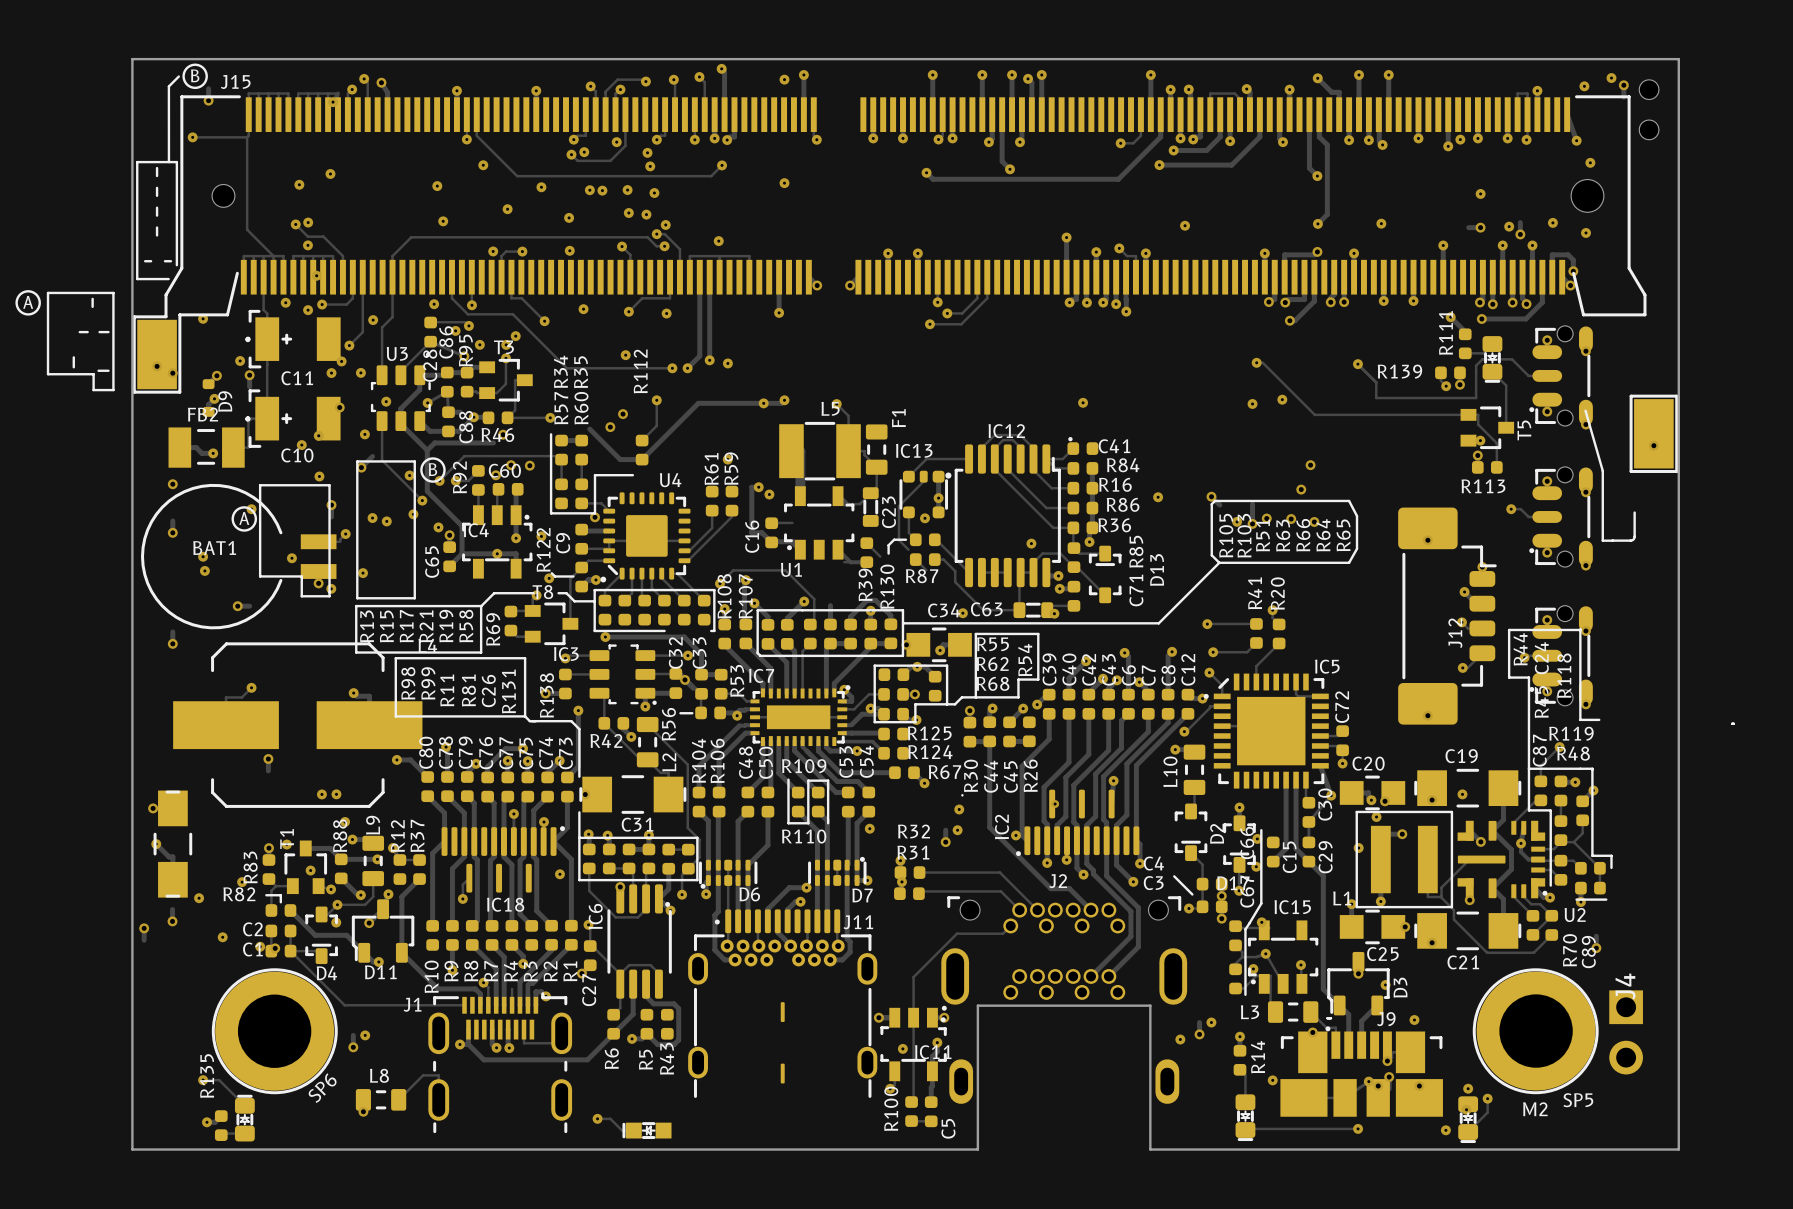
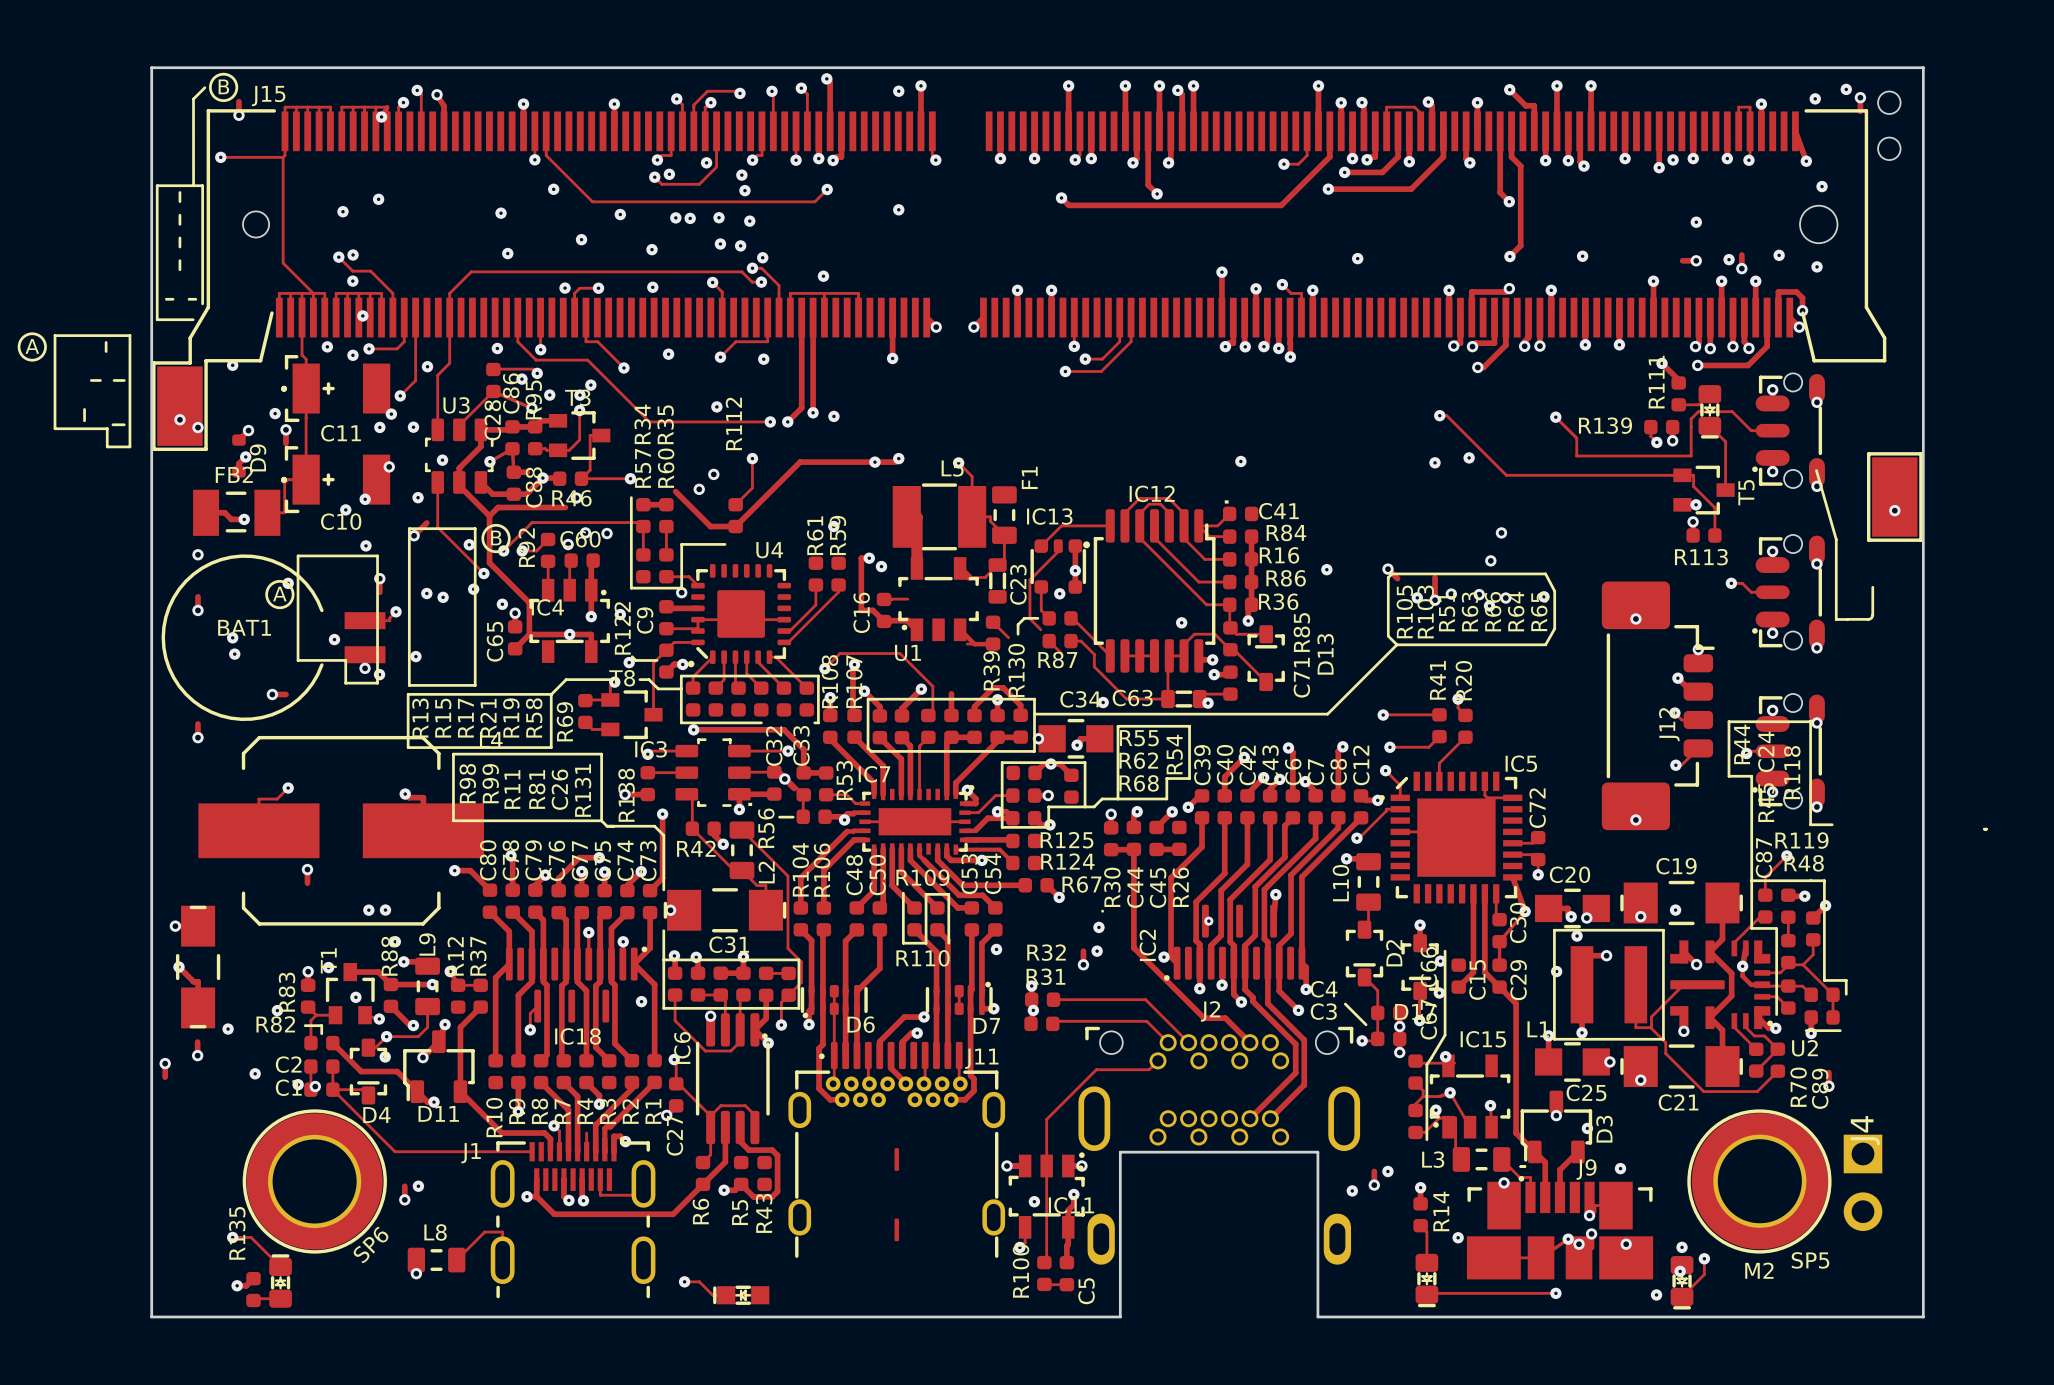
via: none -> (1544, 596)
via: none -> (1489, 605)

